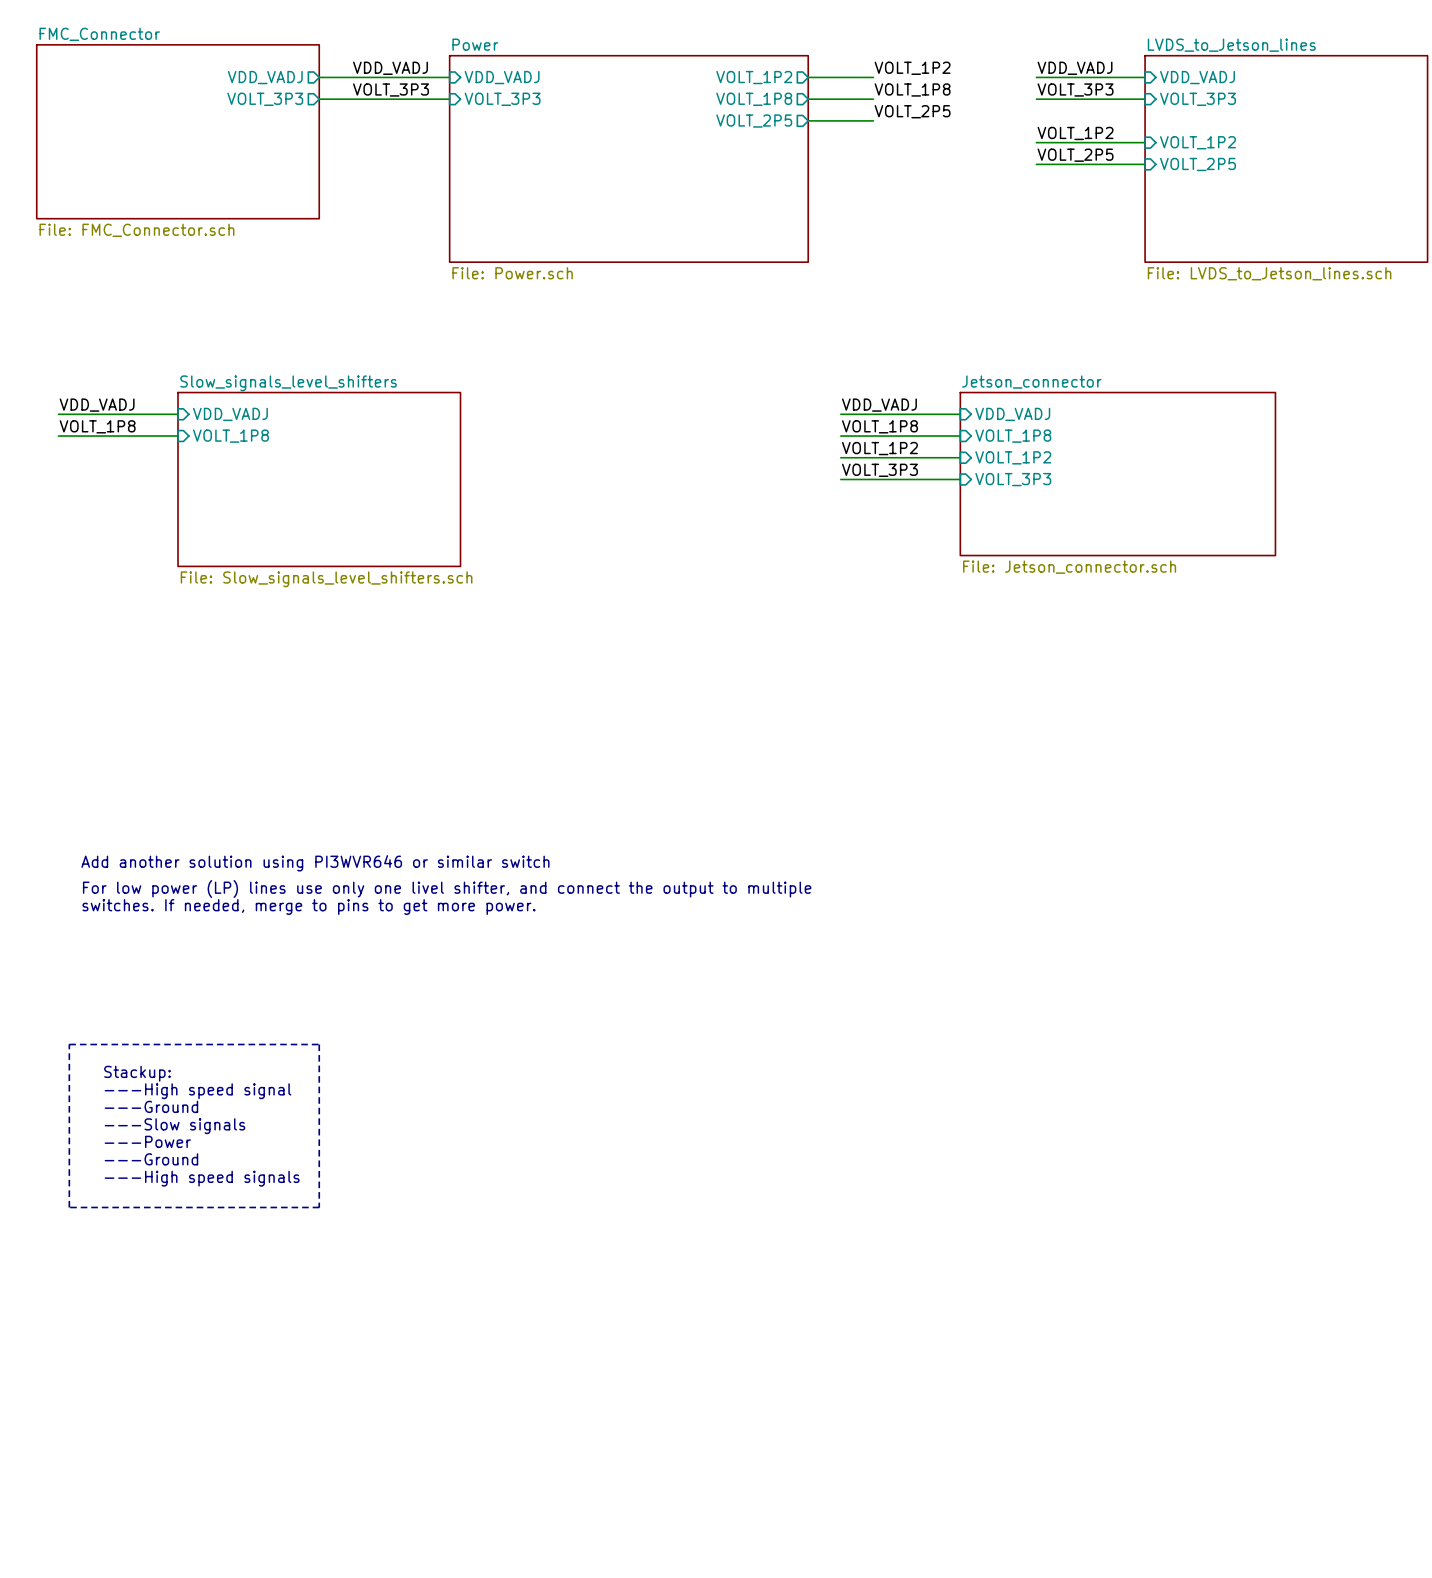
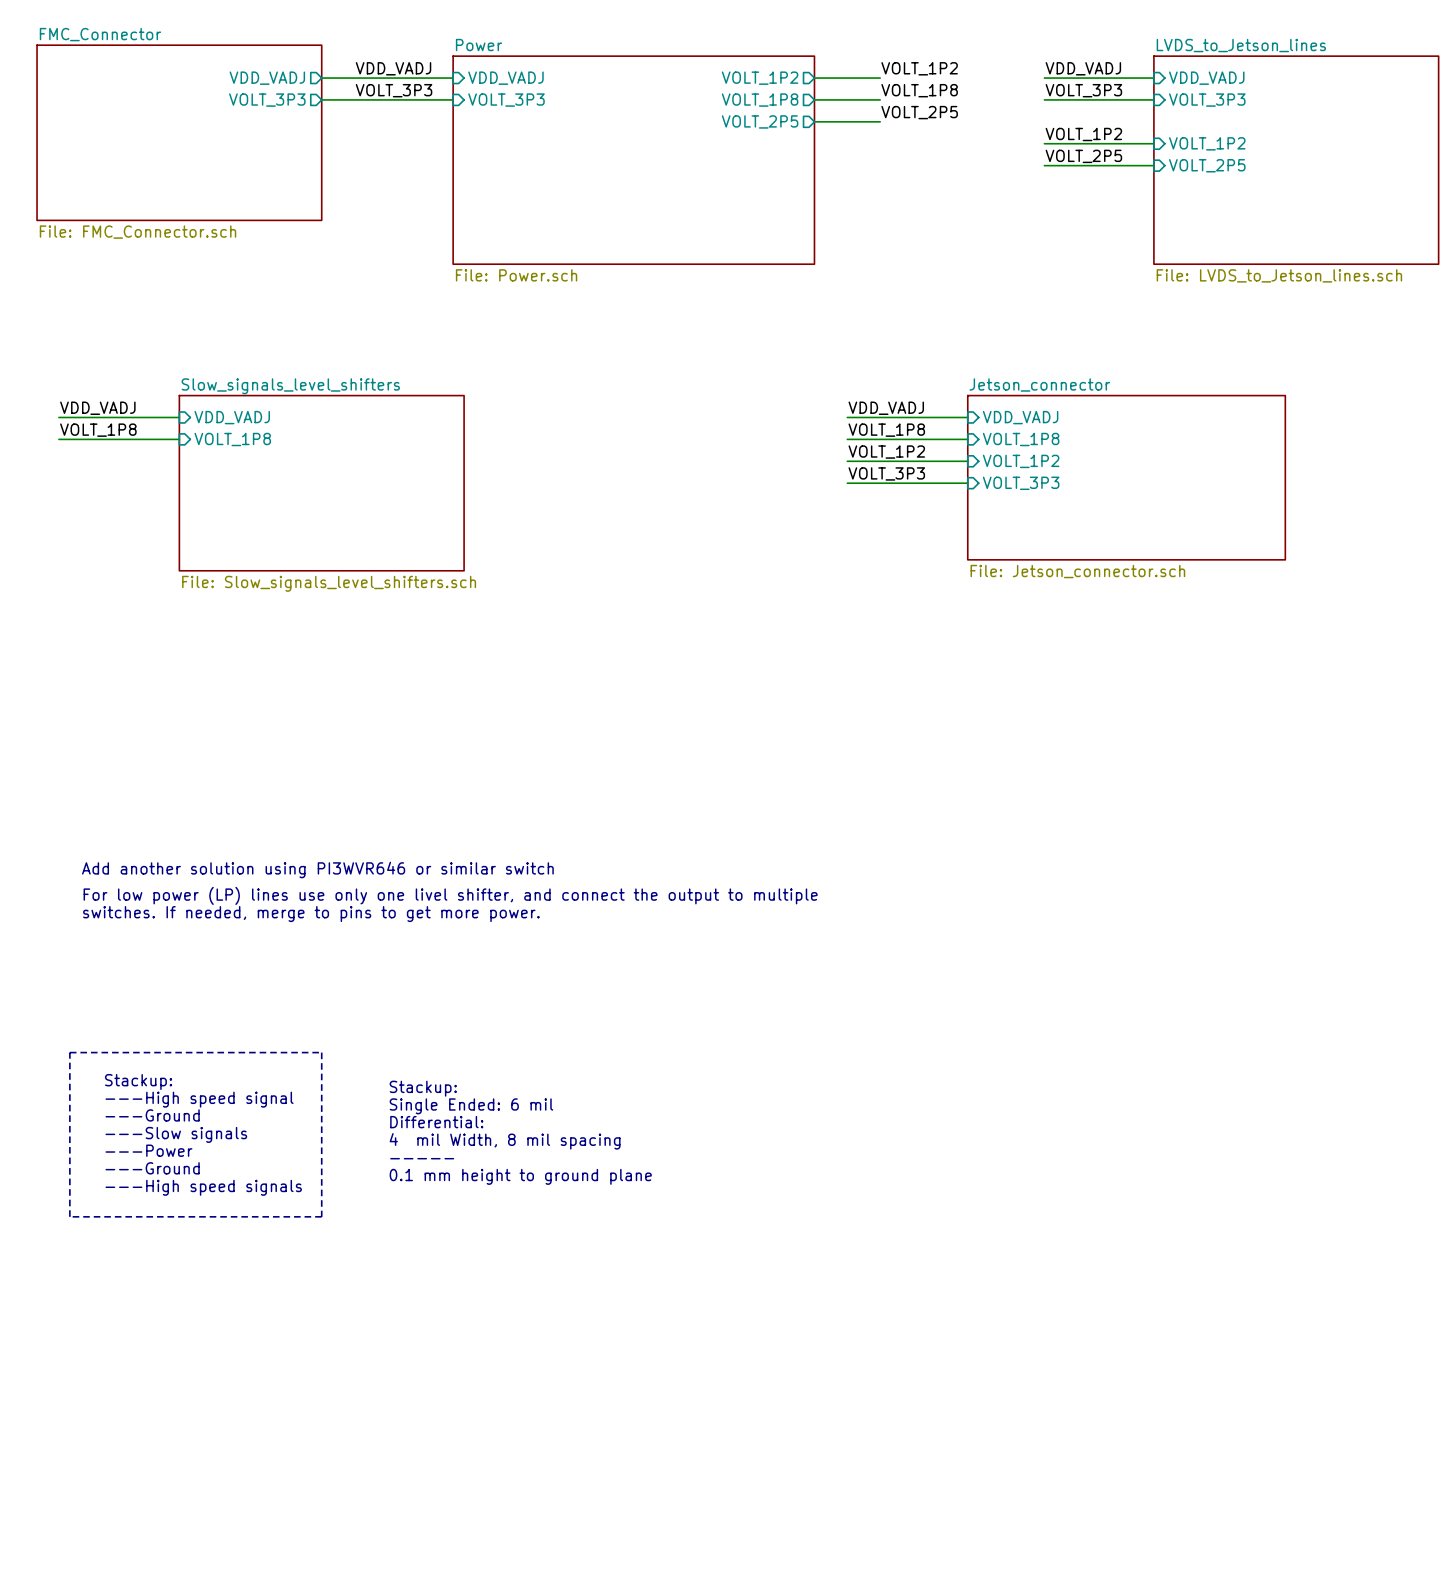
text: none -> Stackup: (423, 1088)
text: none -> Single Ended: 6 mil (471, 1106)
text: none -> Differential: (436, 1122)
text: none -> 4 mil Width, 8 mil spacing (505, 1141)
text: none -> ----- (422, 1158)
text: none -> 0.1 mm height to ground plane (520, 1176)

